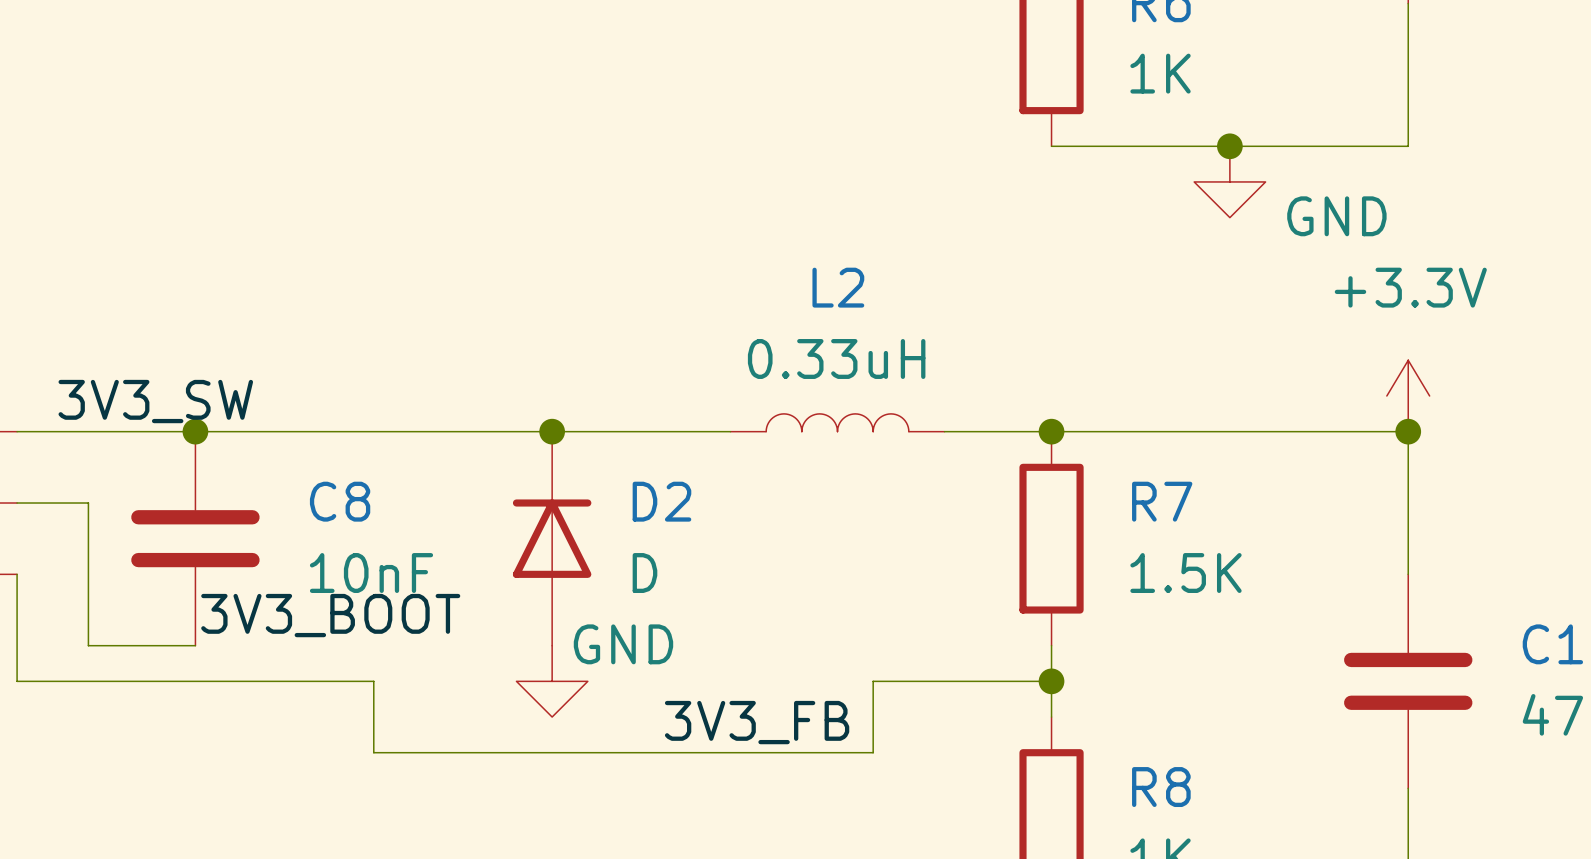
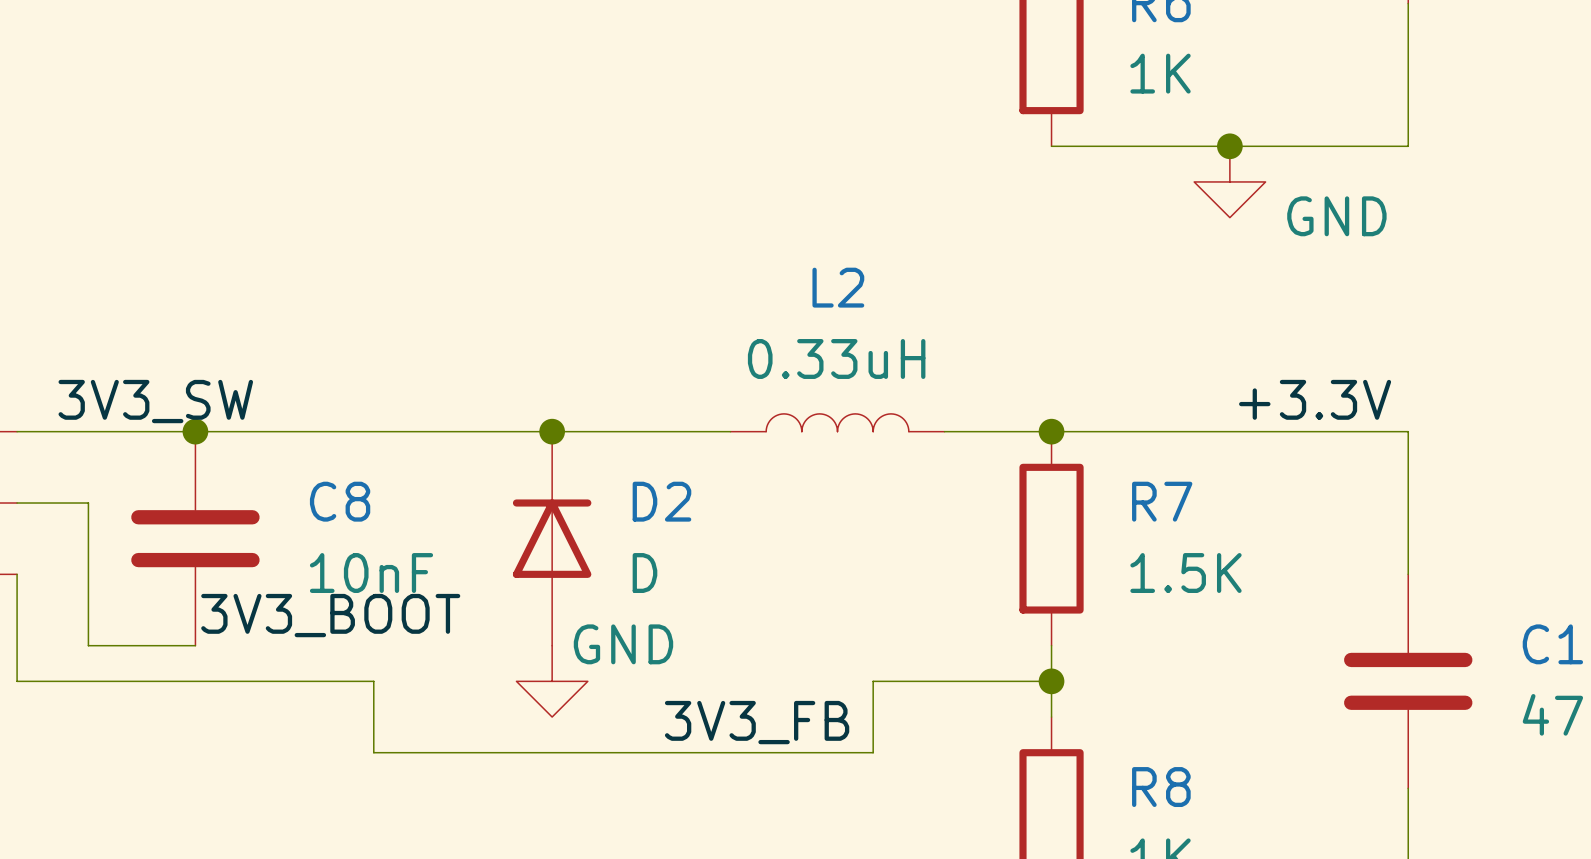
power symbol: +3.3V (1408, 395) -> none
label: none -> +3.3V (1315, 399)
junction: (1408, 431) -> none

